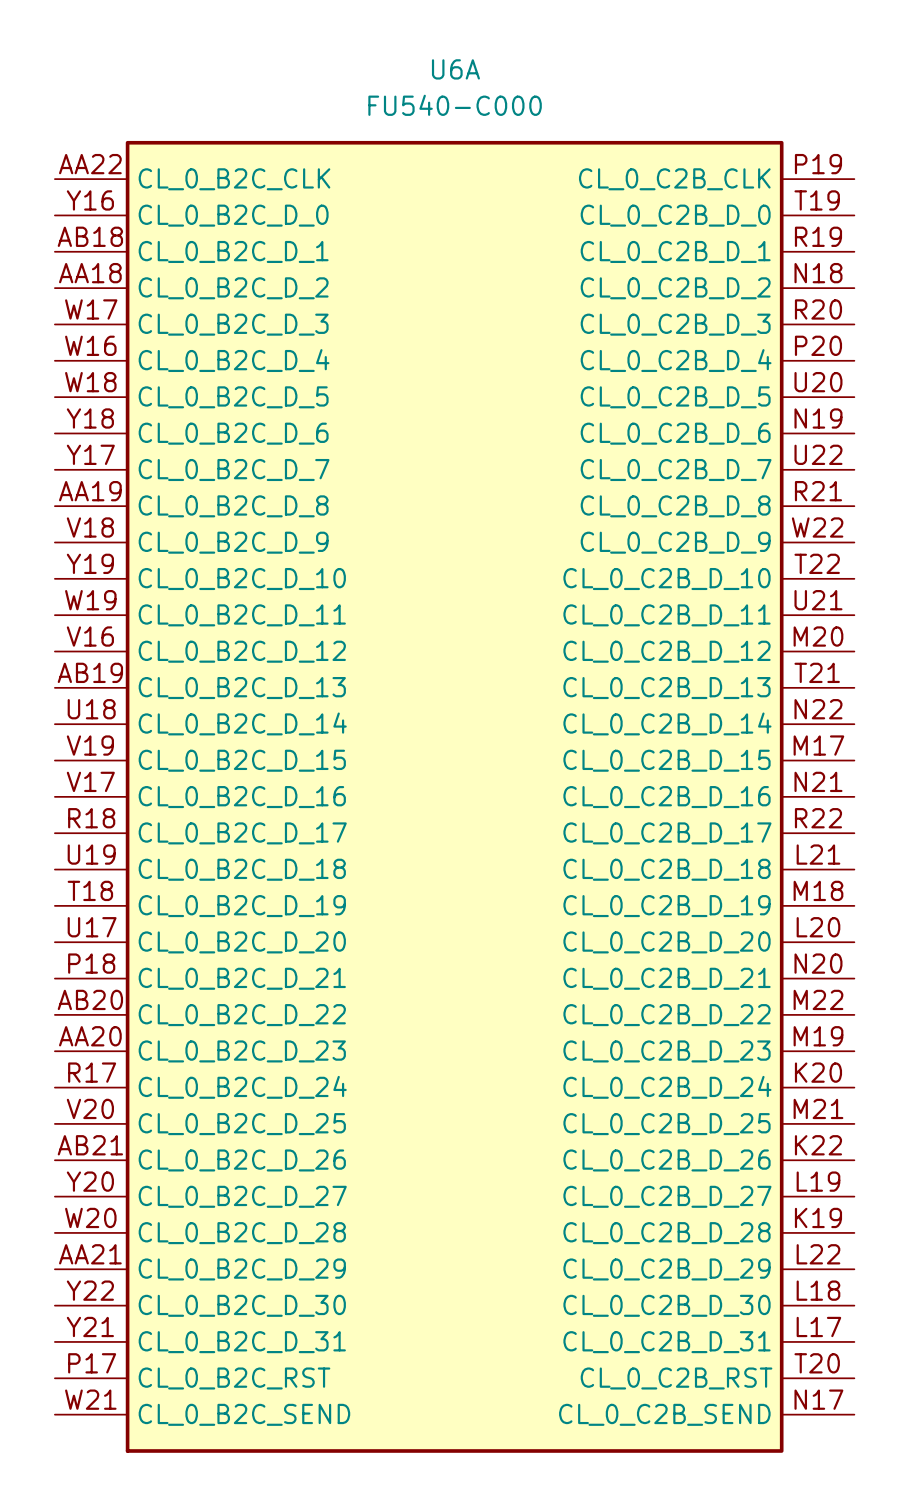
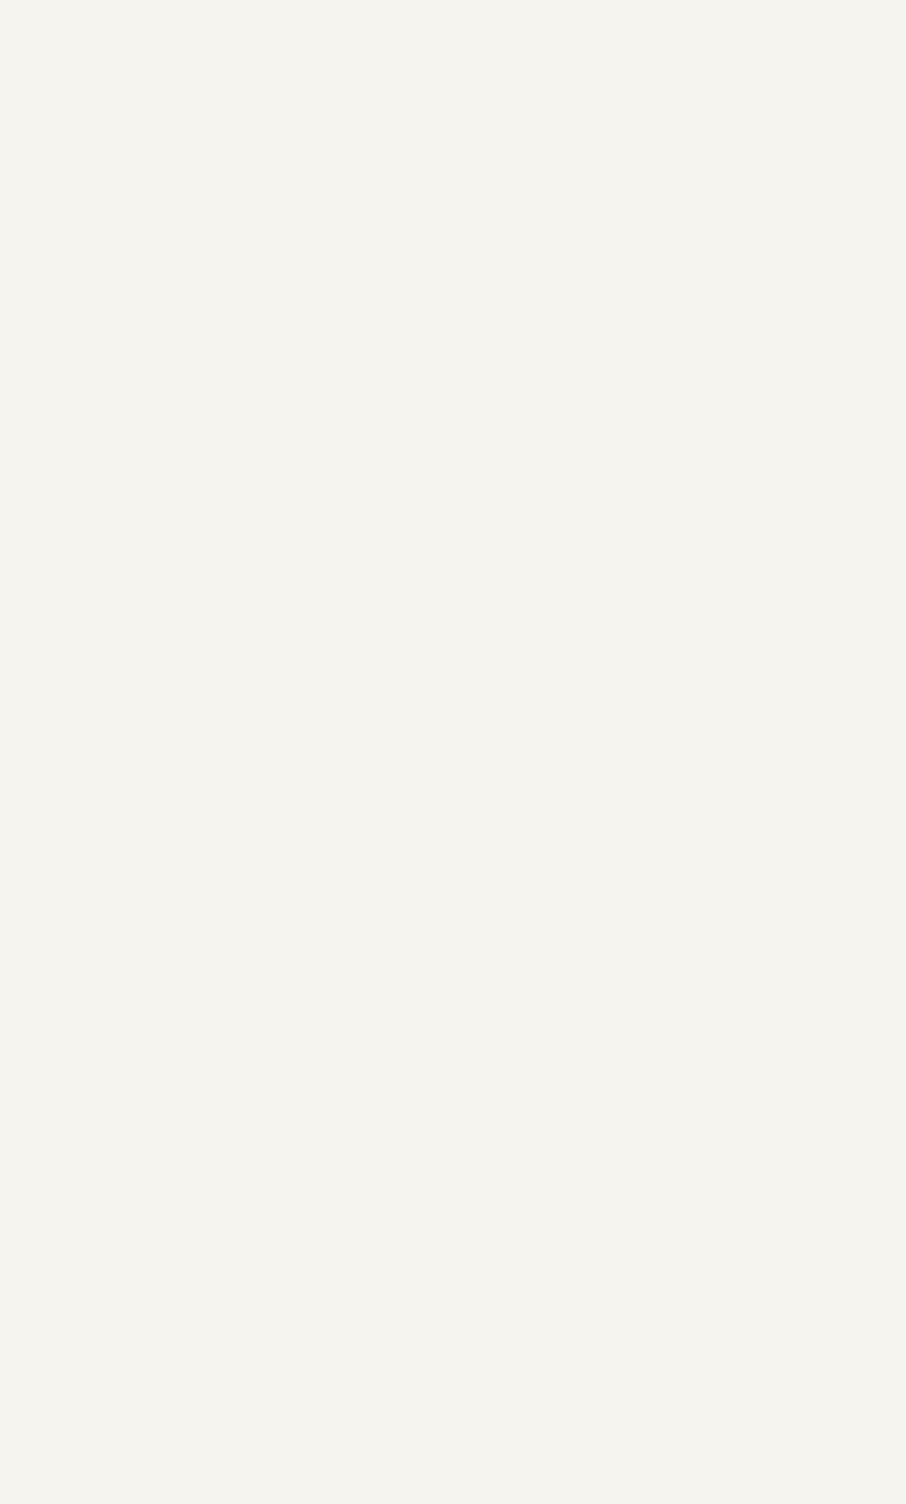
U6A: FU540-C000 (454, 796) -> none

